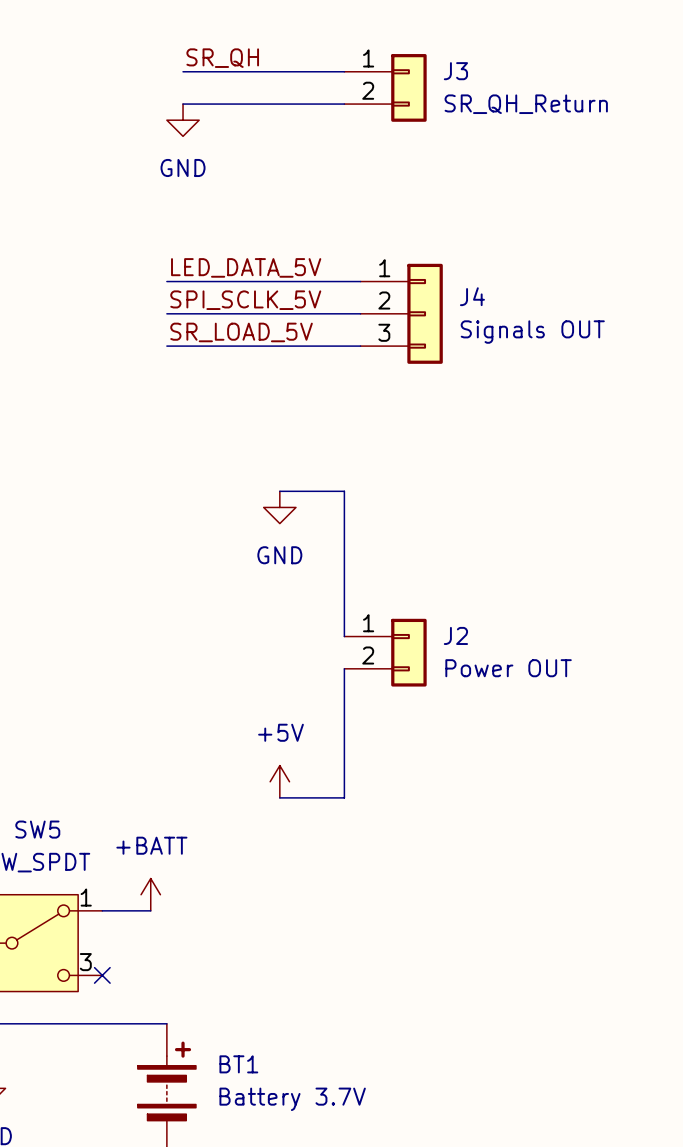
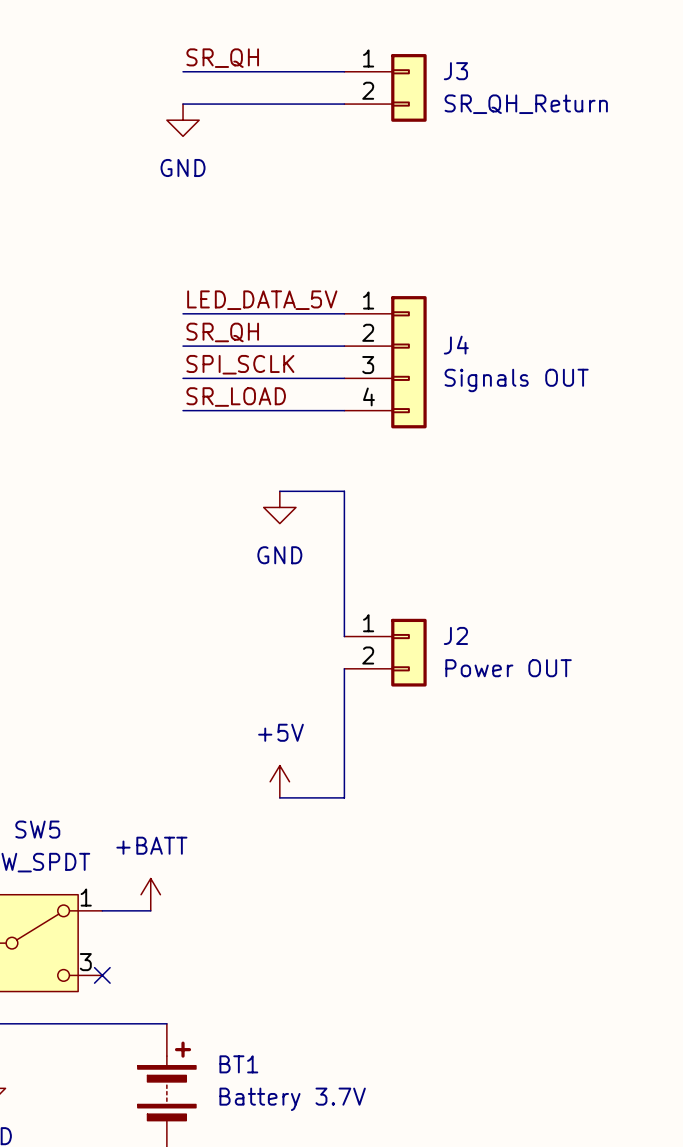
J4 symbol: [360, 263, 443, 364] -> [344, 296, 427, 429]
label position: LED_DATA_5V (246, 267) -> LED_DATA_5V (262, 300)
wire: (166, 281) (360, 281) -> none
label: SPI_SCLK_5V (245, 300) -> none
wire: (166, 313) (183, 313) -> none
label: none -> SR_QH (222, 332)
label: SR_LOAD_5V (241, 332) -> none
wire: (166, 346) (183, 346) -> none
label: none -> SPI_SCLK (240, 364)
wire: none -> (183, 378) (344, 378)
label: none -> SR_LOAD (236, 397)
wire: none -> (183, 410) (344, 410)

